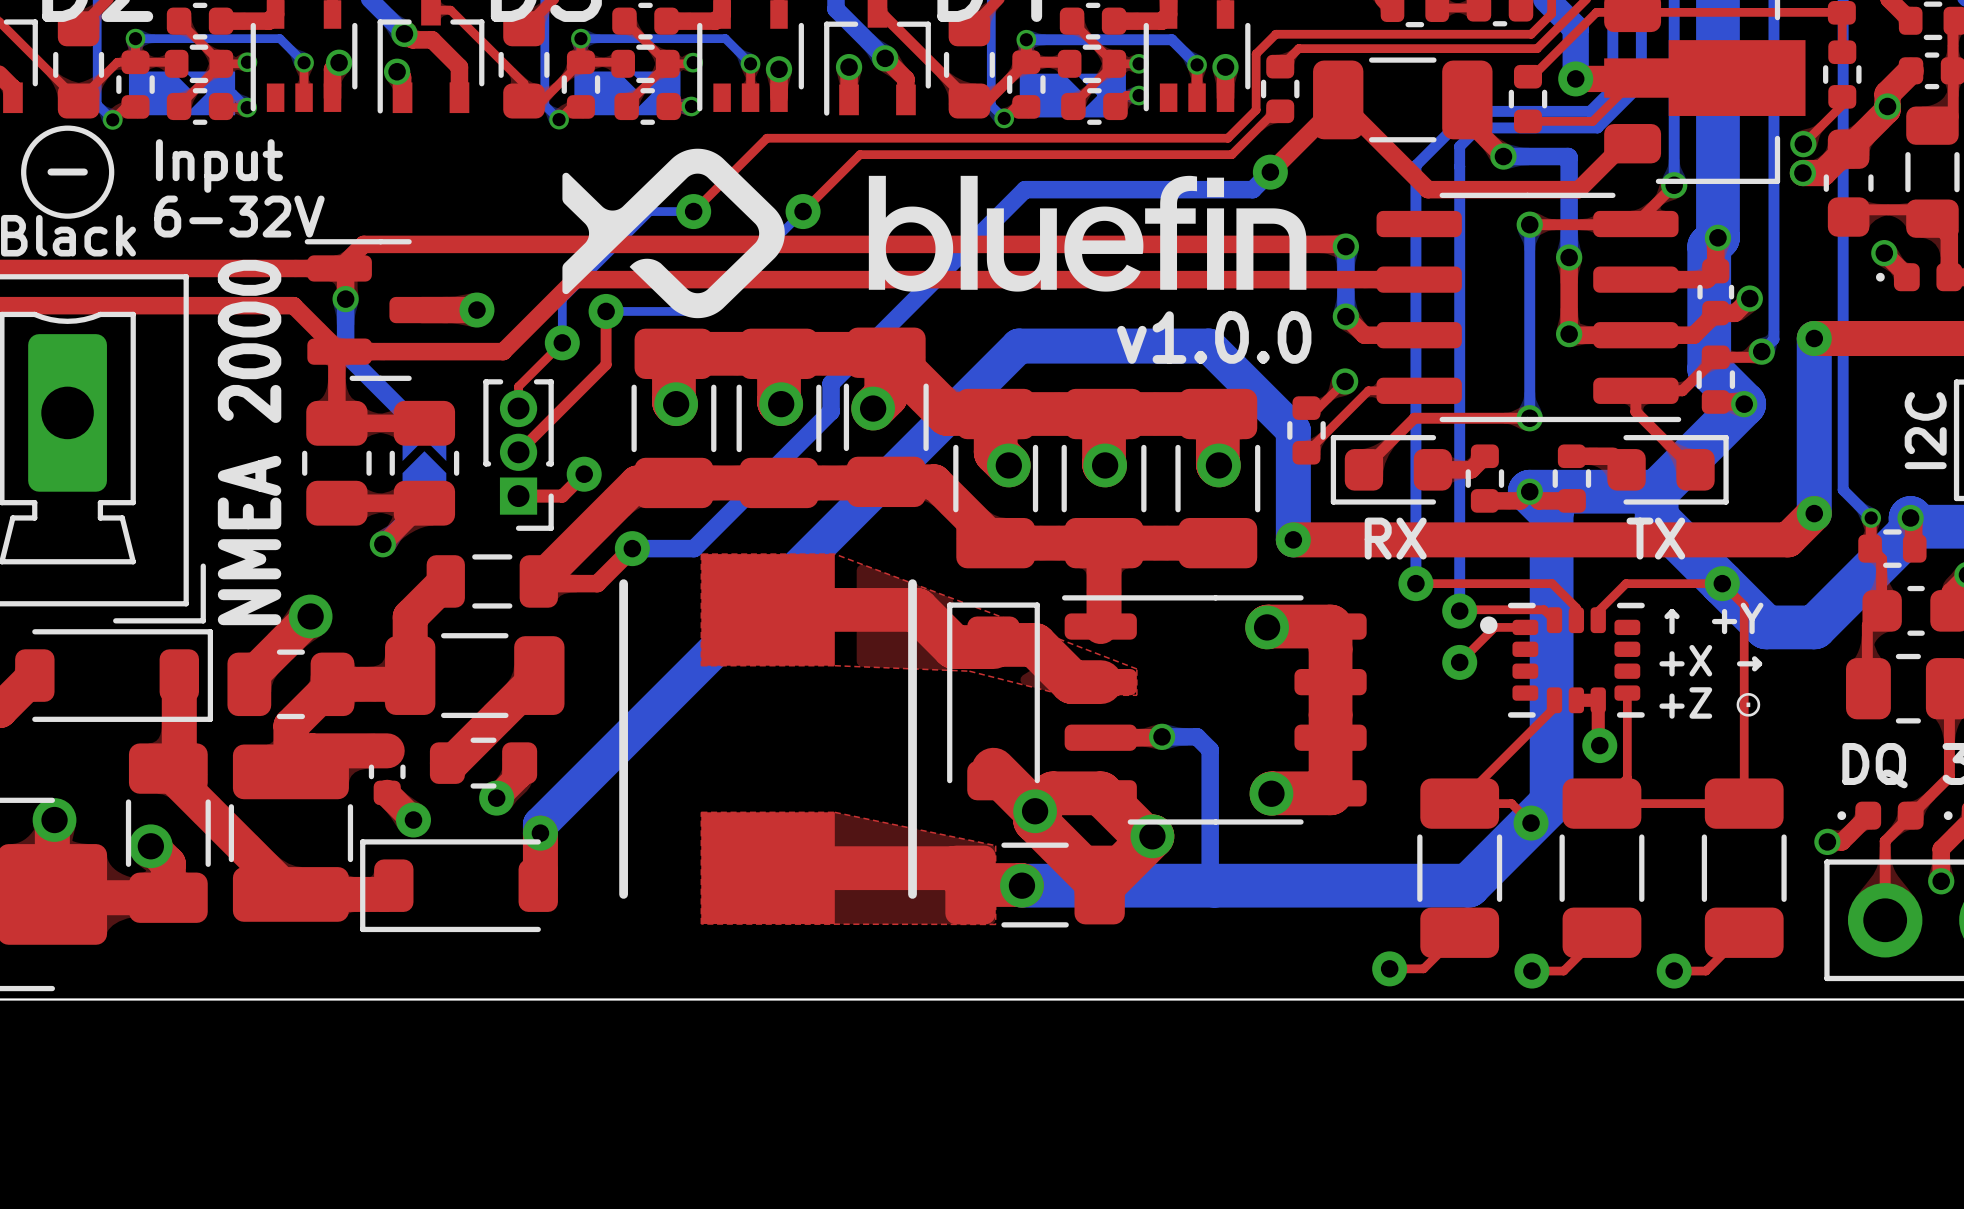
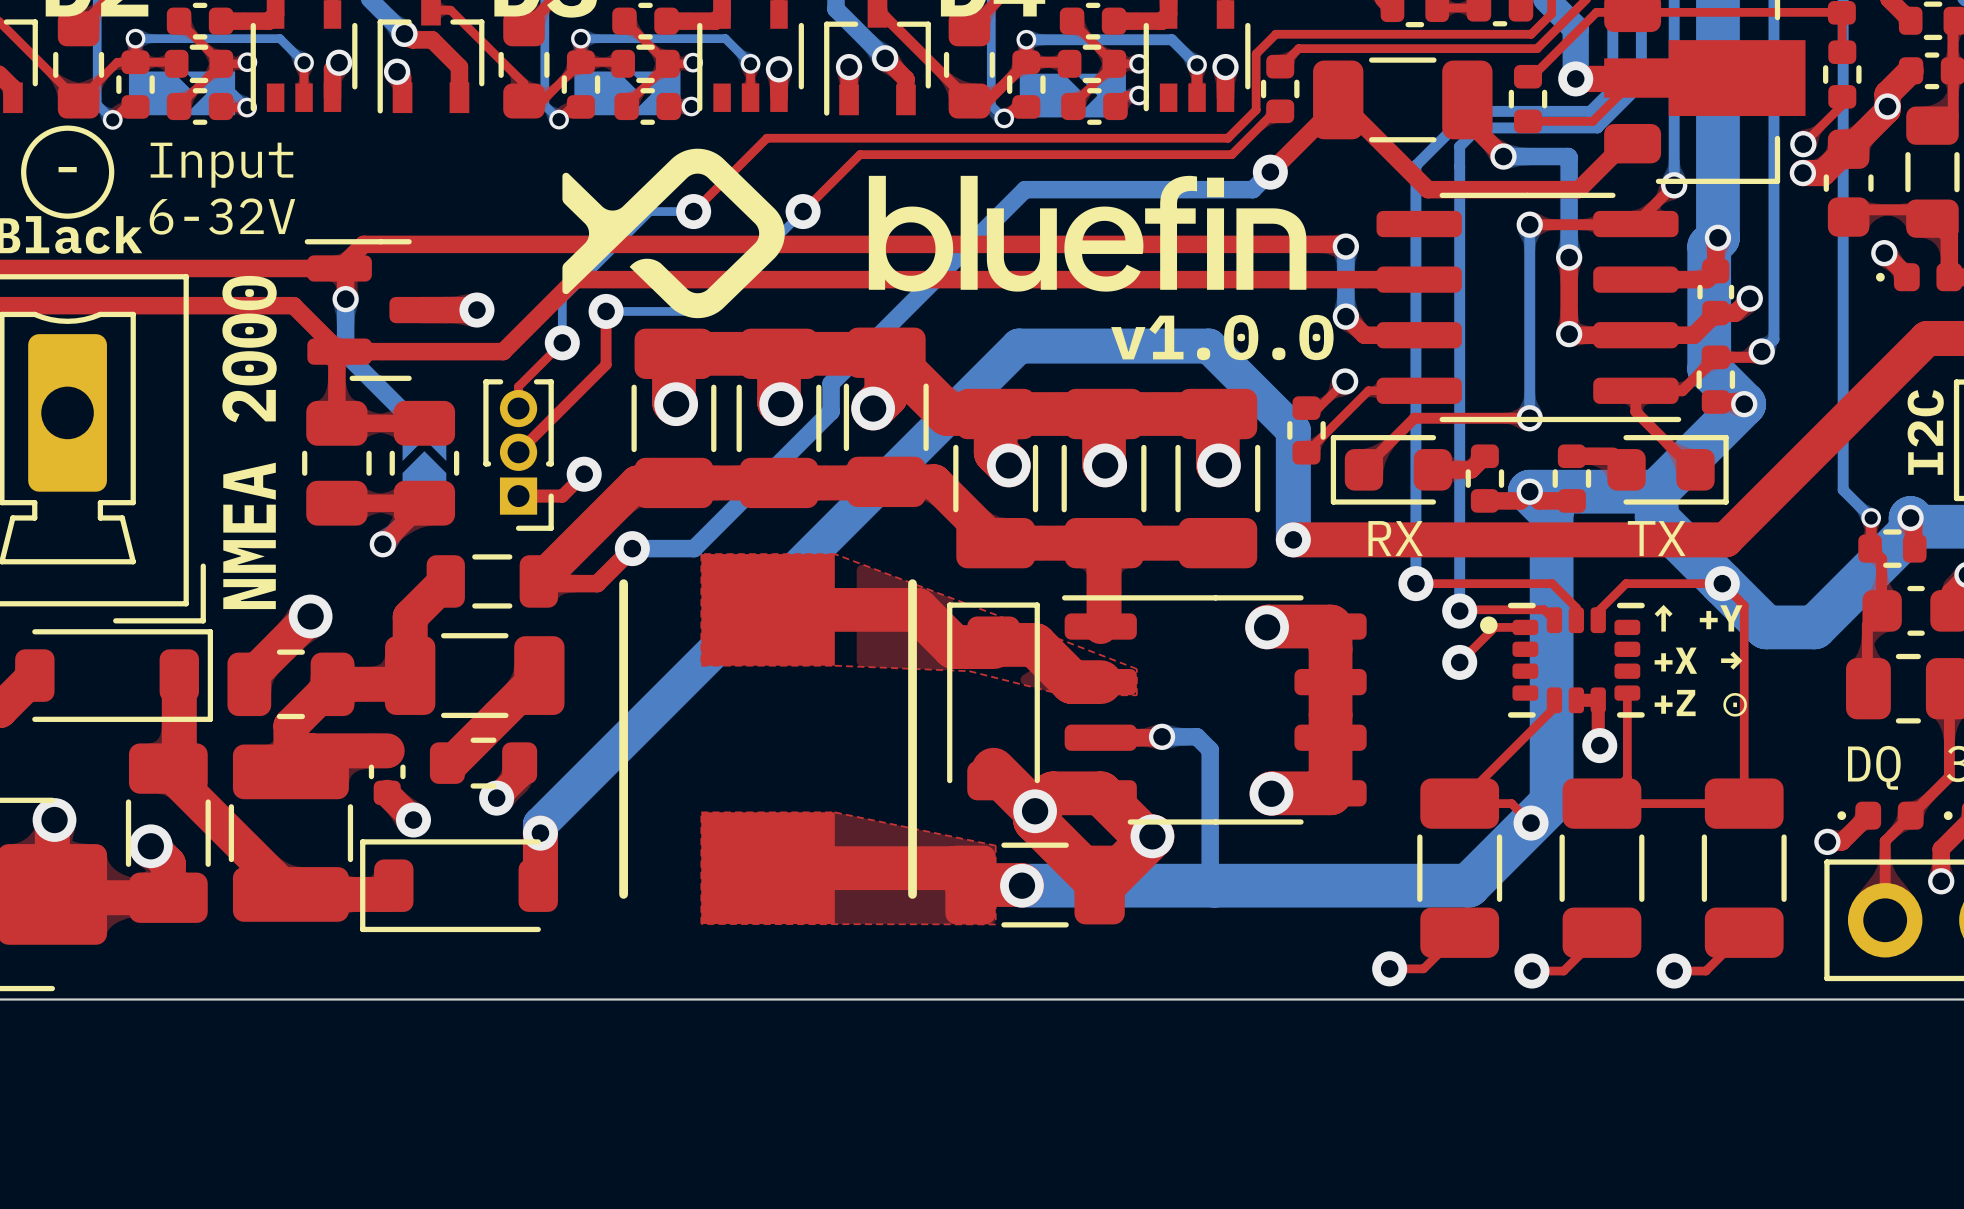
top track: (1814, 338) (1926, 338) -> none
bottom track: (1814, 338) (1814, 513) -> none
via: (1814, 338) -> none
top track: (1814, 513) (1788, 539) (1725, 539) -> (1926, 338) (1725, 539)
via: (1814, 513) -> none

